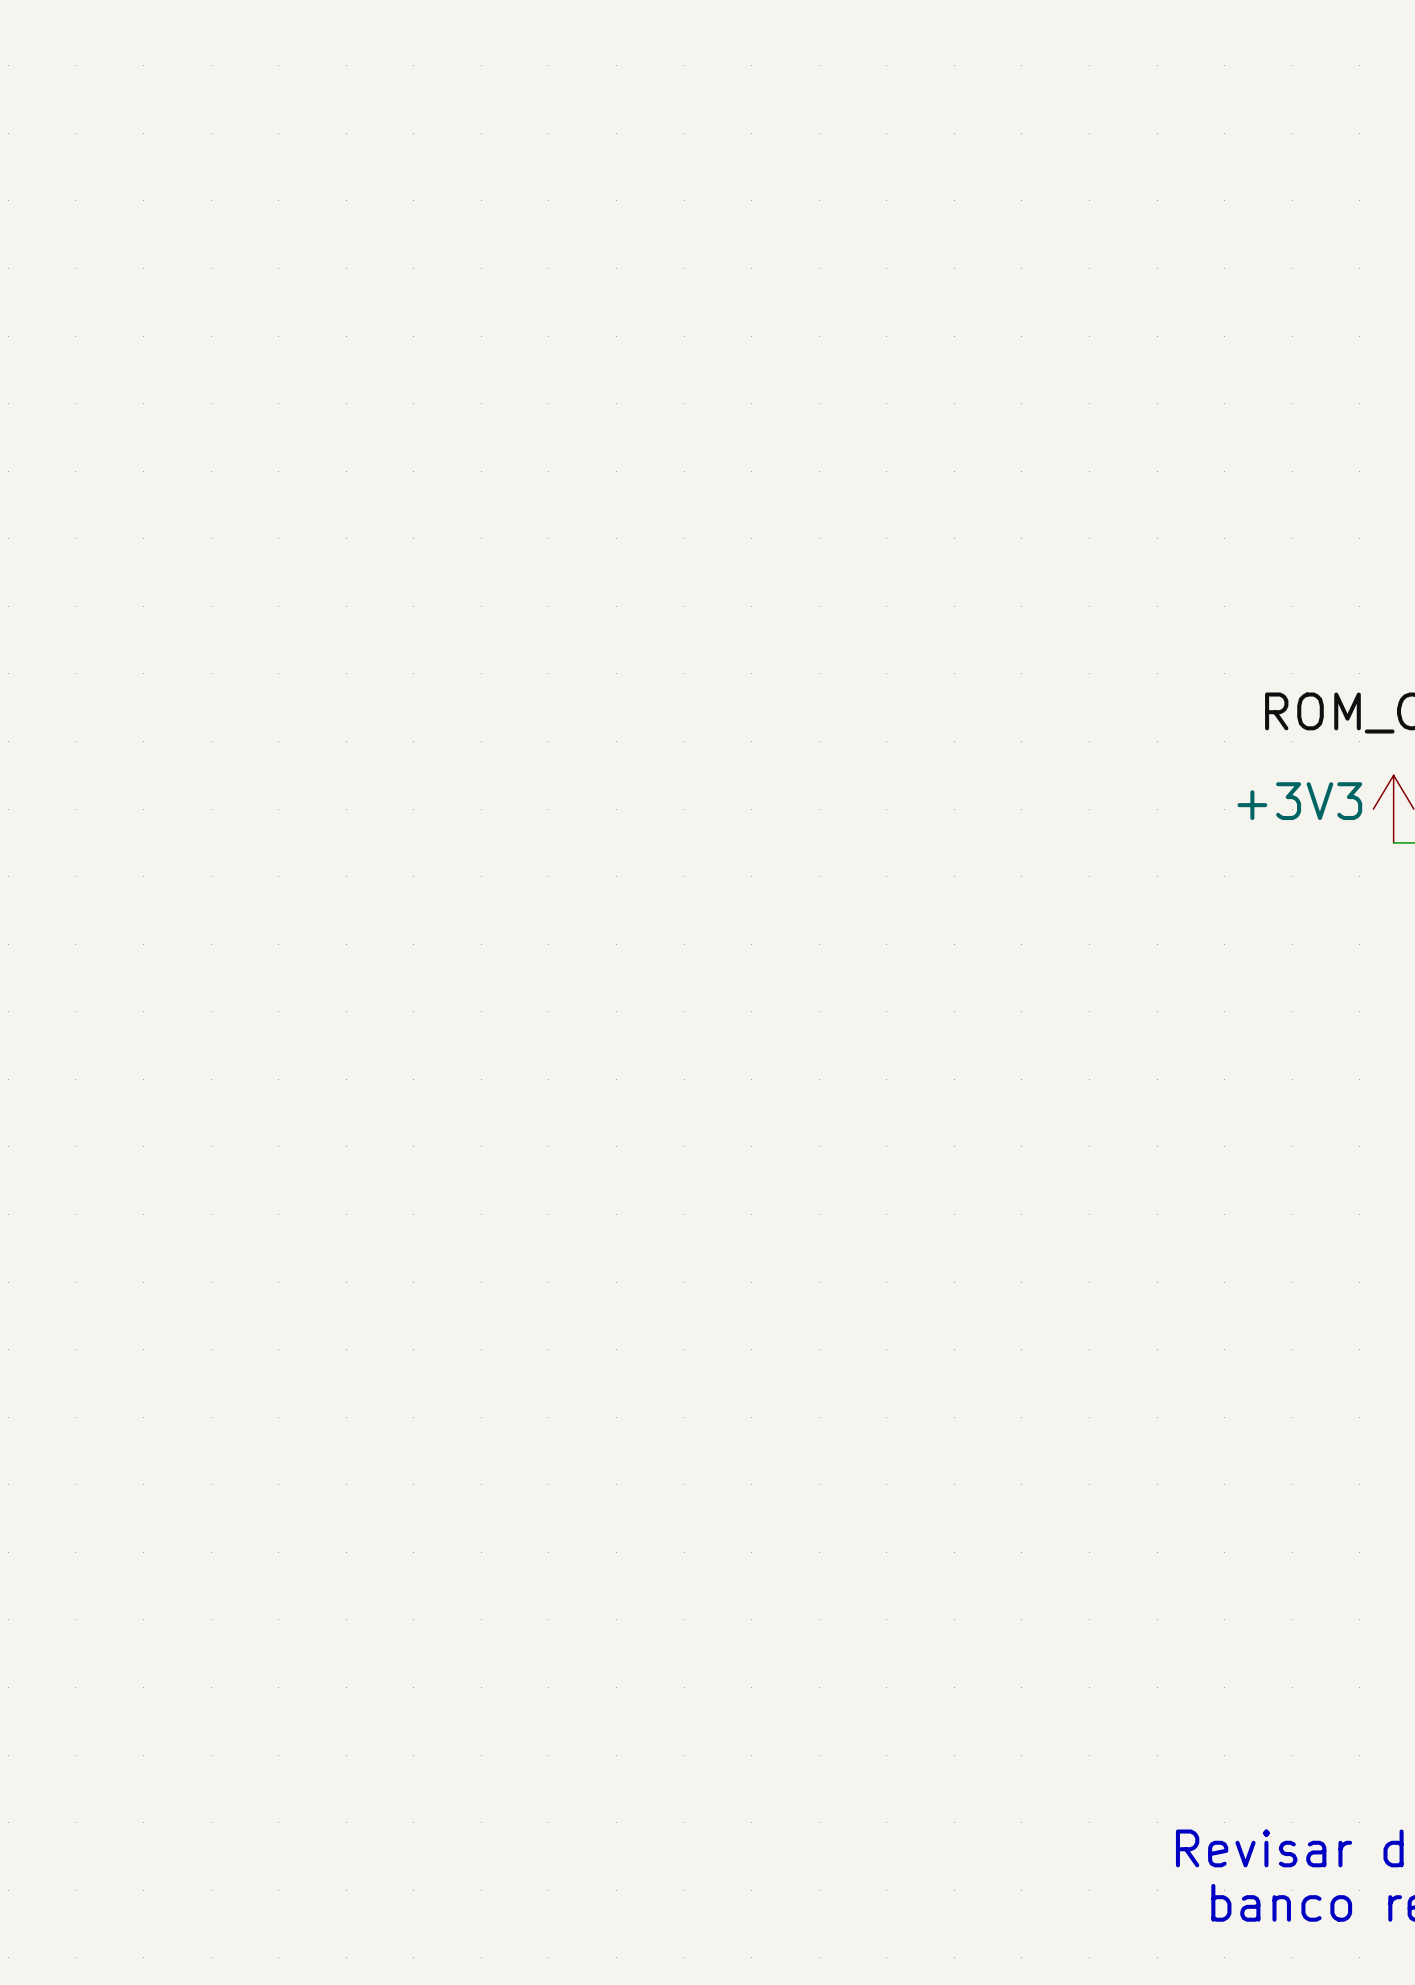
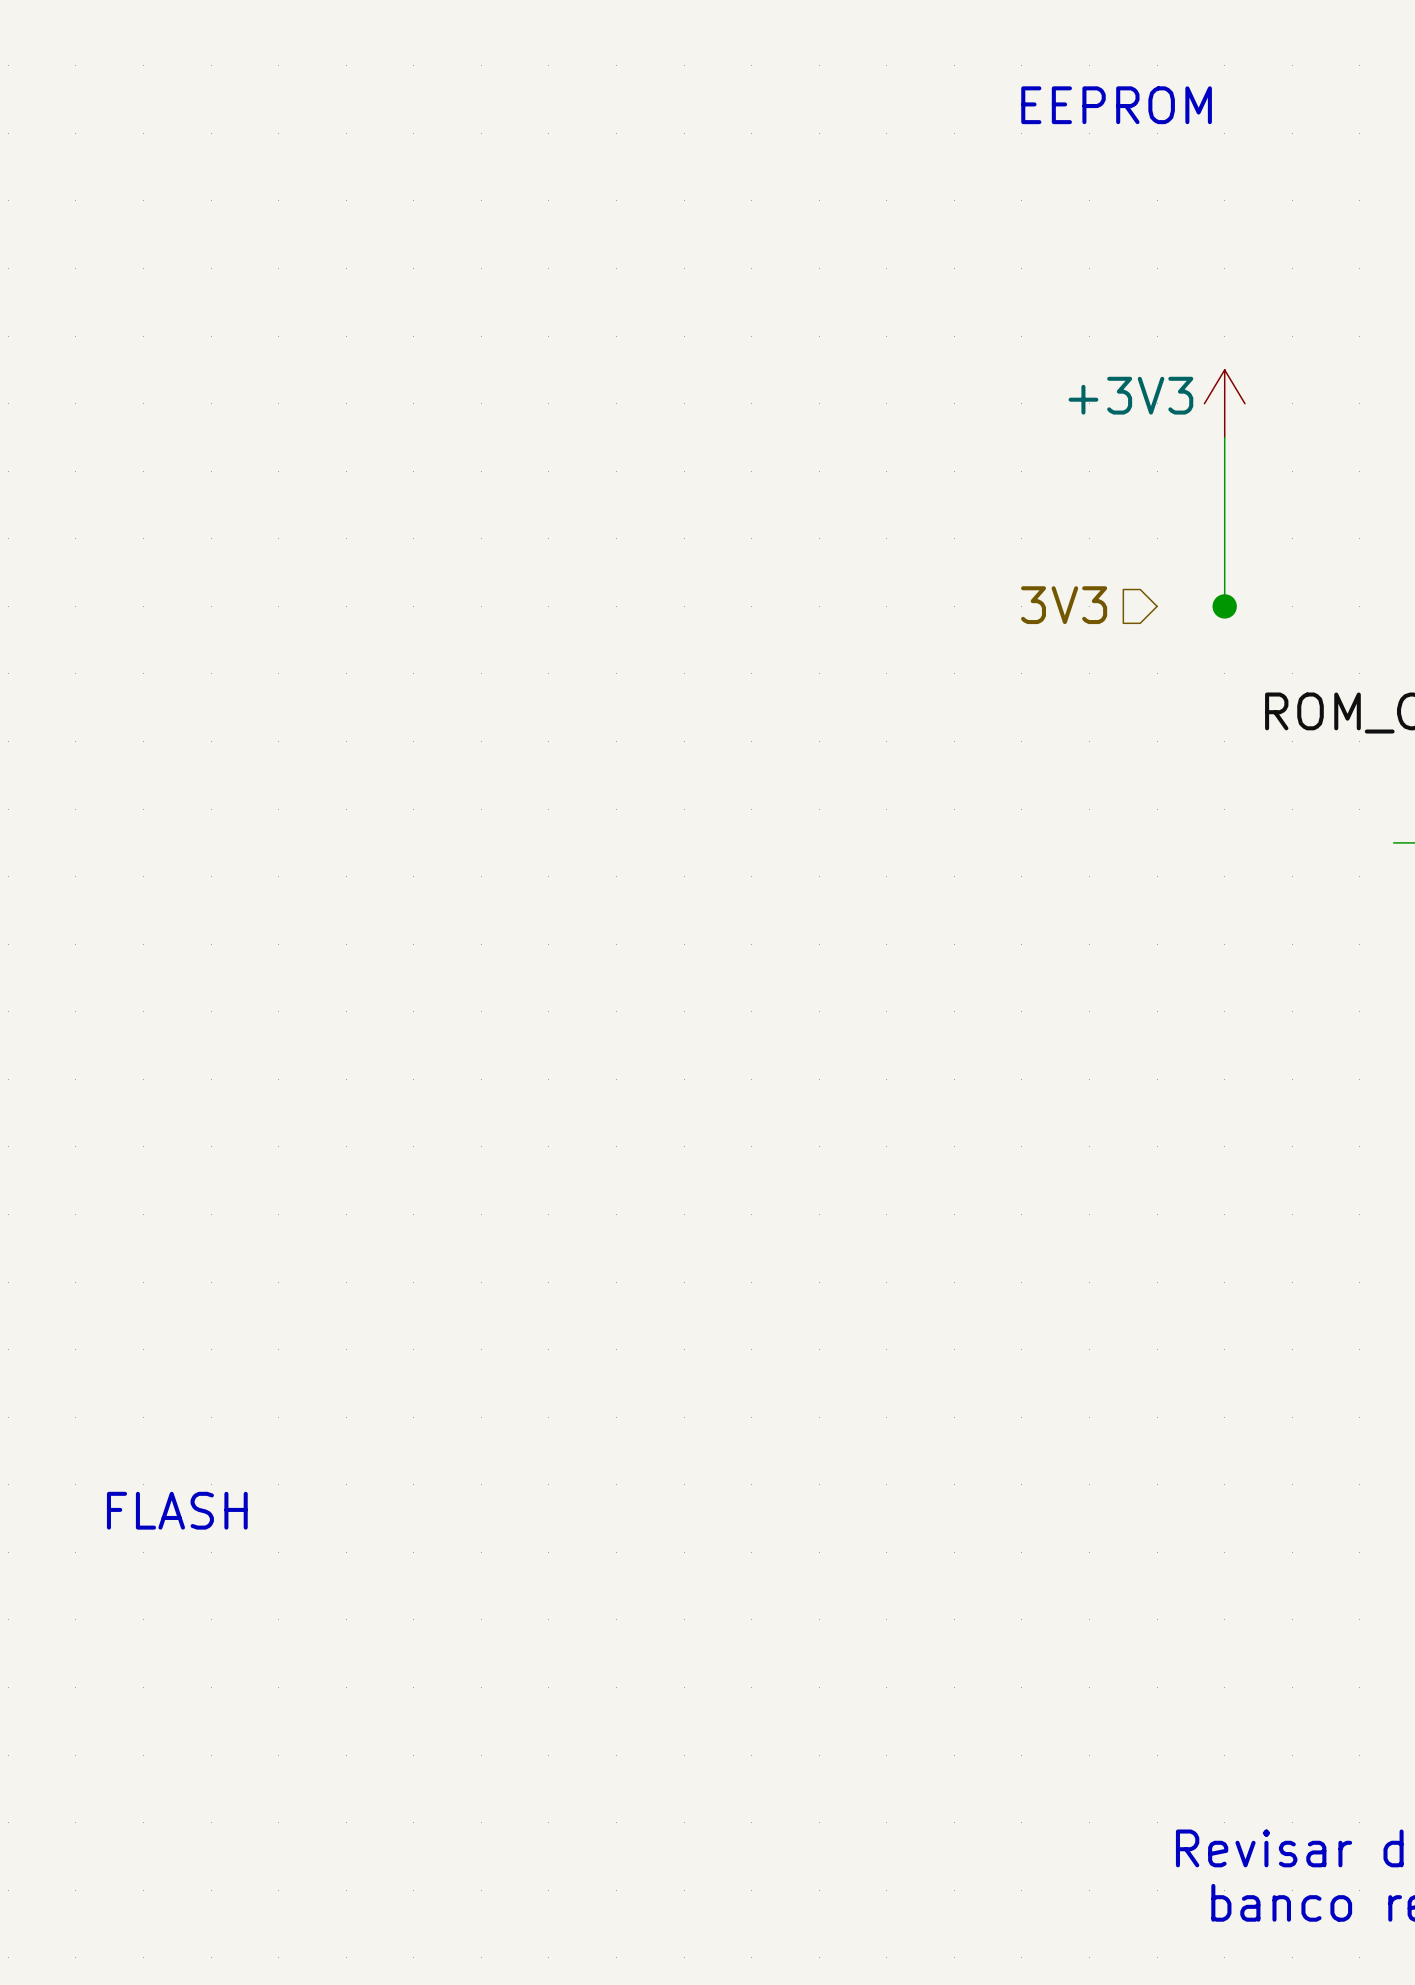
text: none -> EEPROM (1116, 105)
power symbol: none -> +3V3 (1224, 403)
wire: none -> (1224, 437) (1224, 606)
hierarchical label: none -> 3V3 (1064, 605)
junction: none -> (1224, 606)
power symbol: +3V3 (1393, 809) -> none
text: none -> FLASH (177, 1510)

